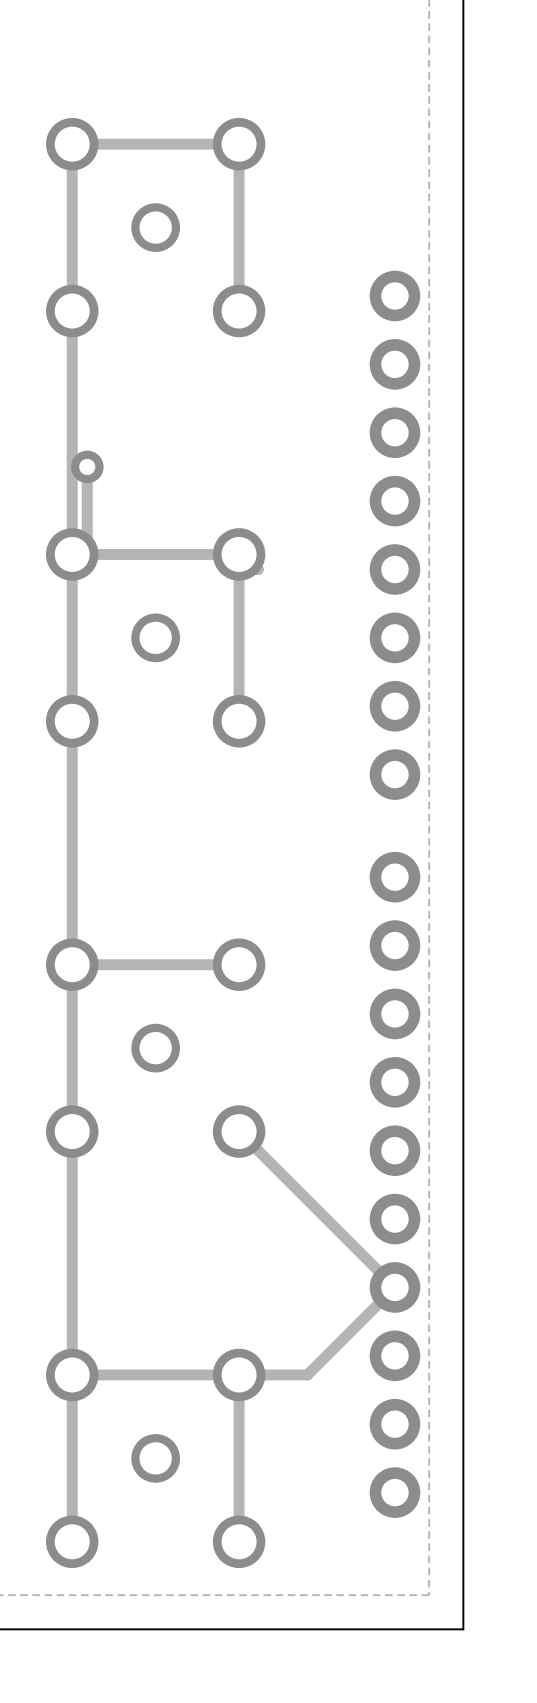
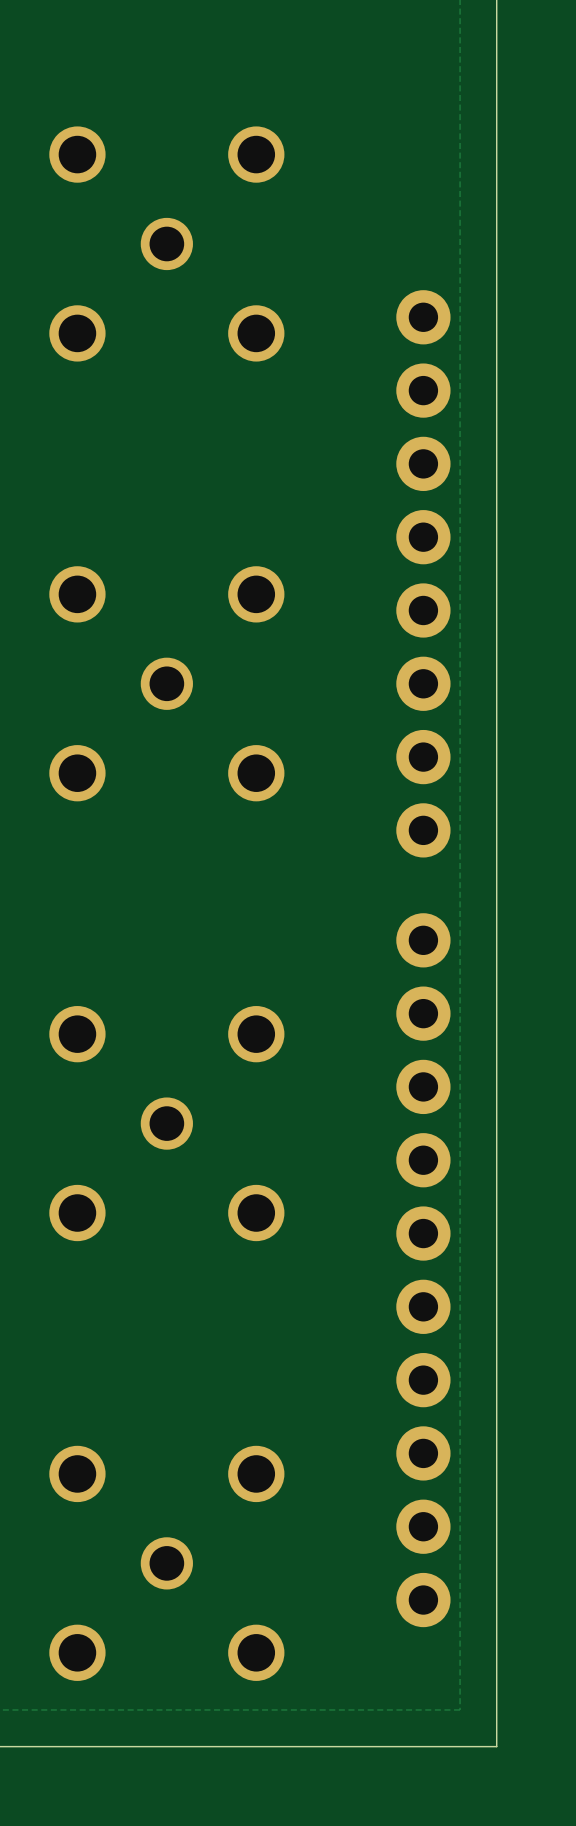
track: (239, 311) (239, 144) (72, 144) (72, 539) (87, 554) (87, 466) -> none
via: (87, 466) -> none
track: (239, 721) (239, 554) (254, 569) (258, 569) (243, 554) (72, 554) (72, 1541) -> none
track: (239, 964) (72, 964) -> none
track: (239, 1131) (394, 1287) (307, 1374) (72, 1374) -> none
track: (239, 1374) (239, 1541) -> none

